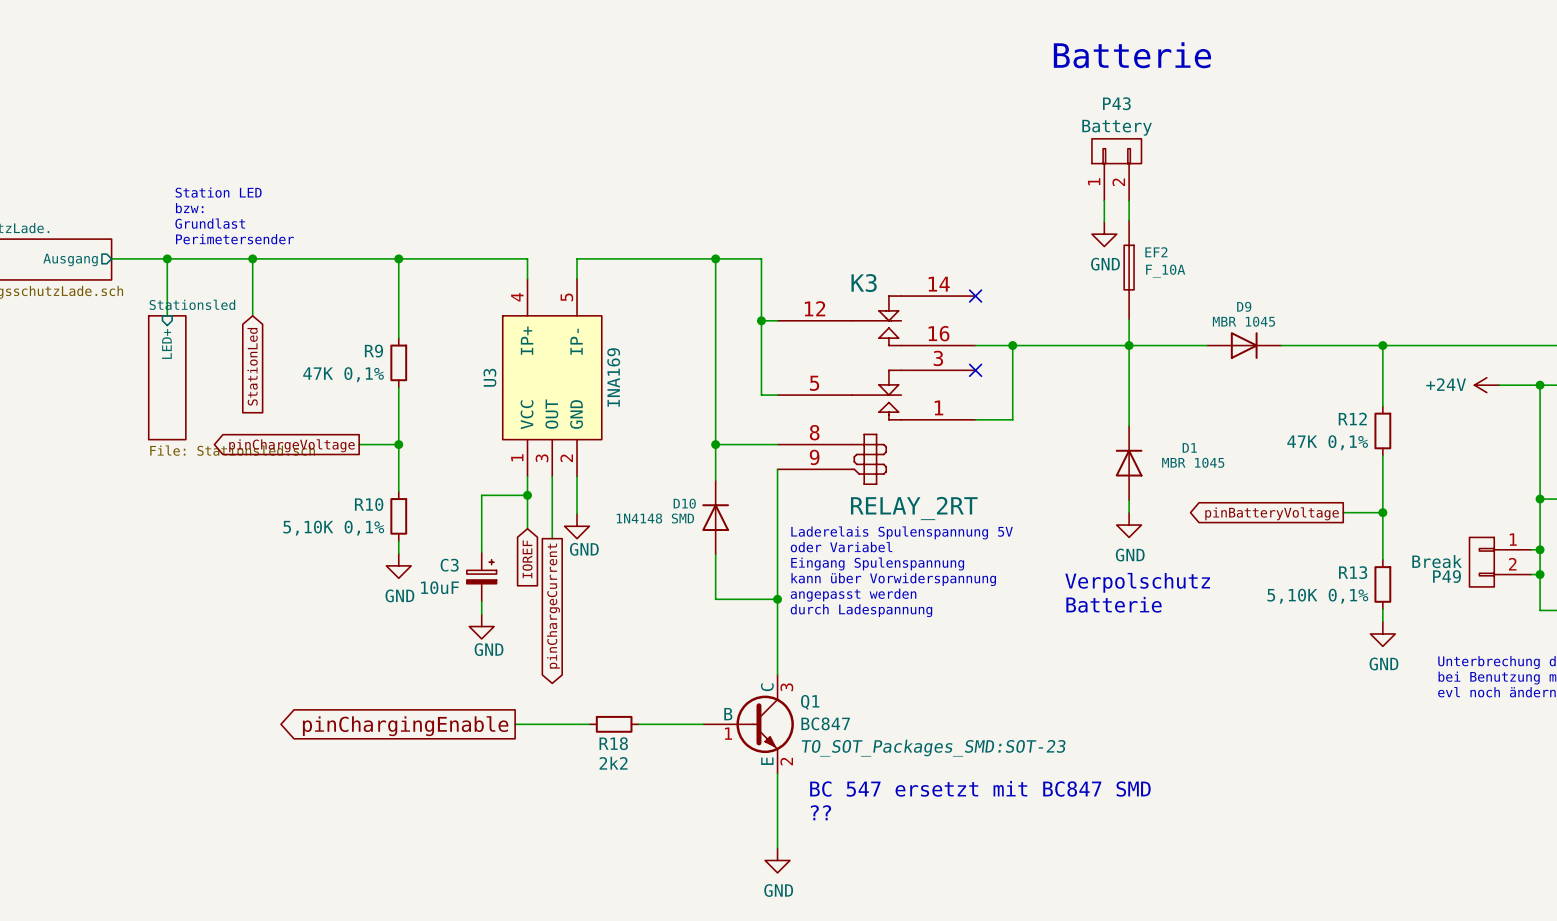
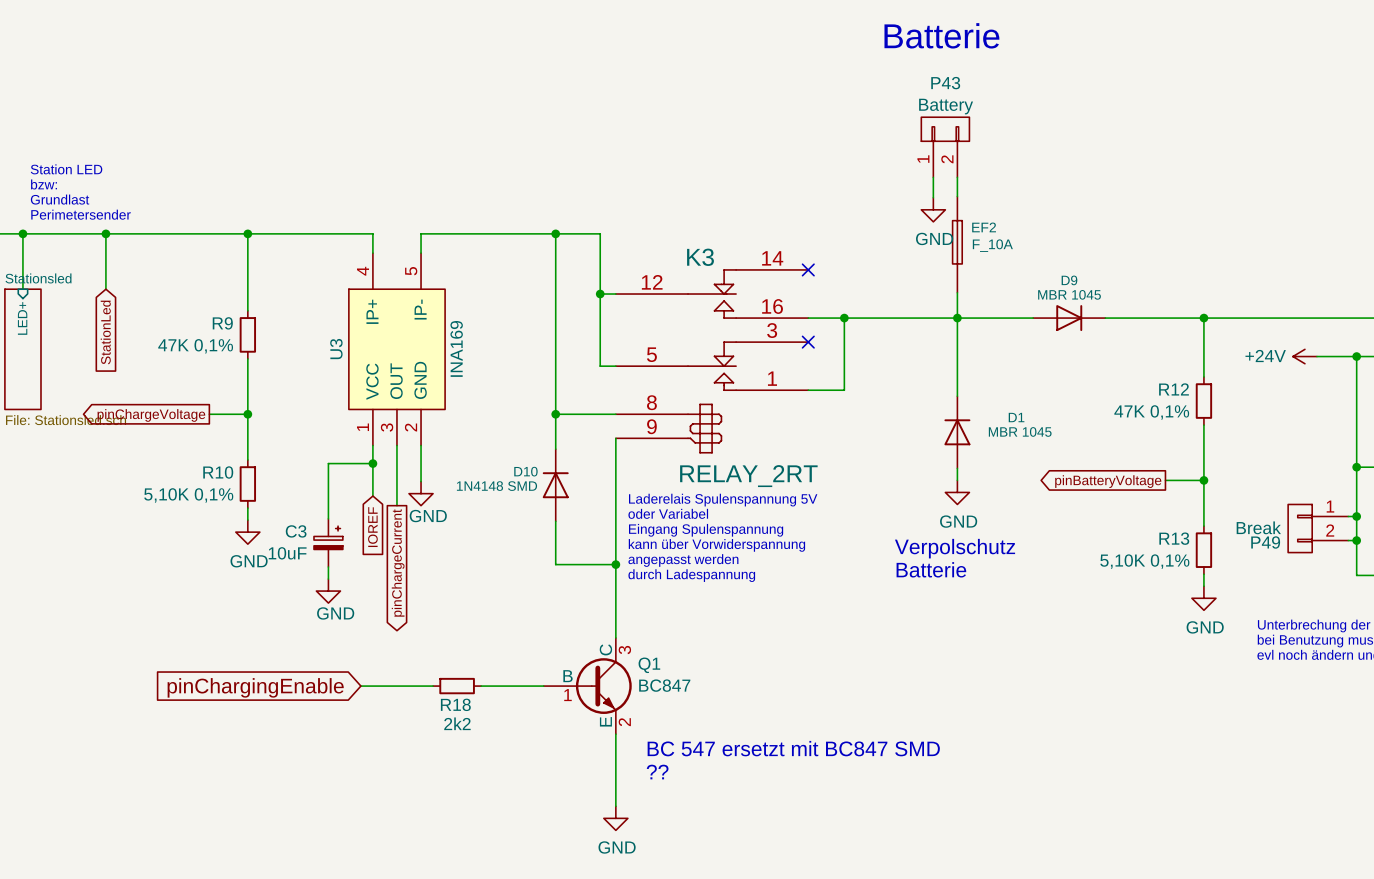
global label shape: output (405, 726) -> input (255, 687)
Q1 text: TO_SOT_Packages_SMD:SOT-23 (933, 748) -> none

